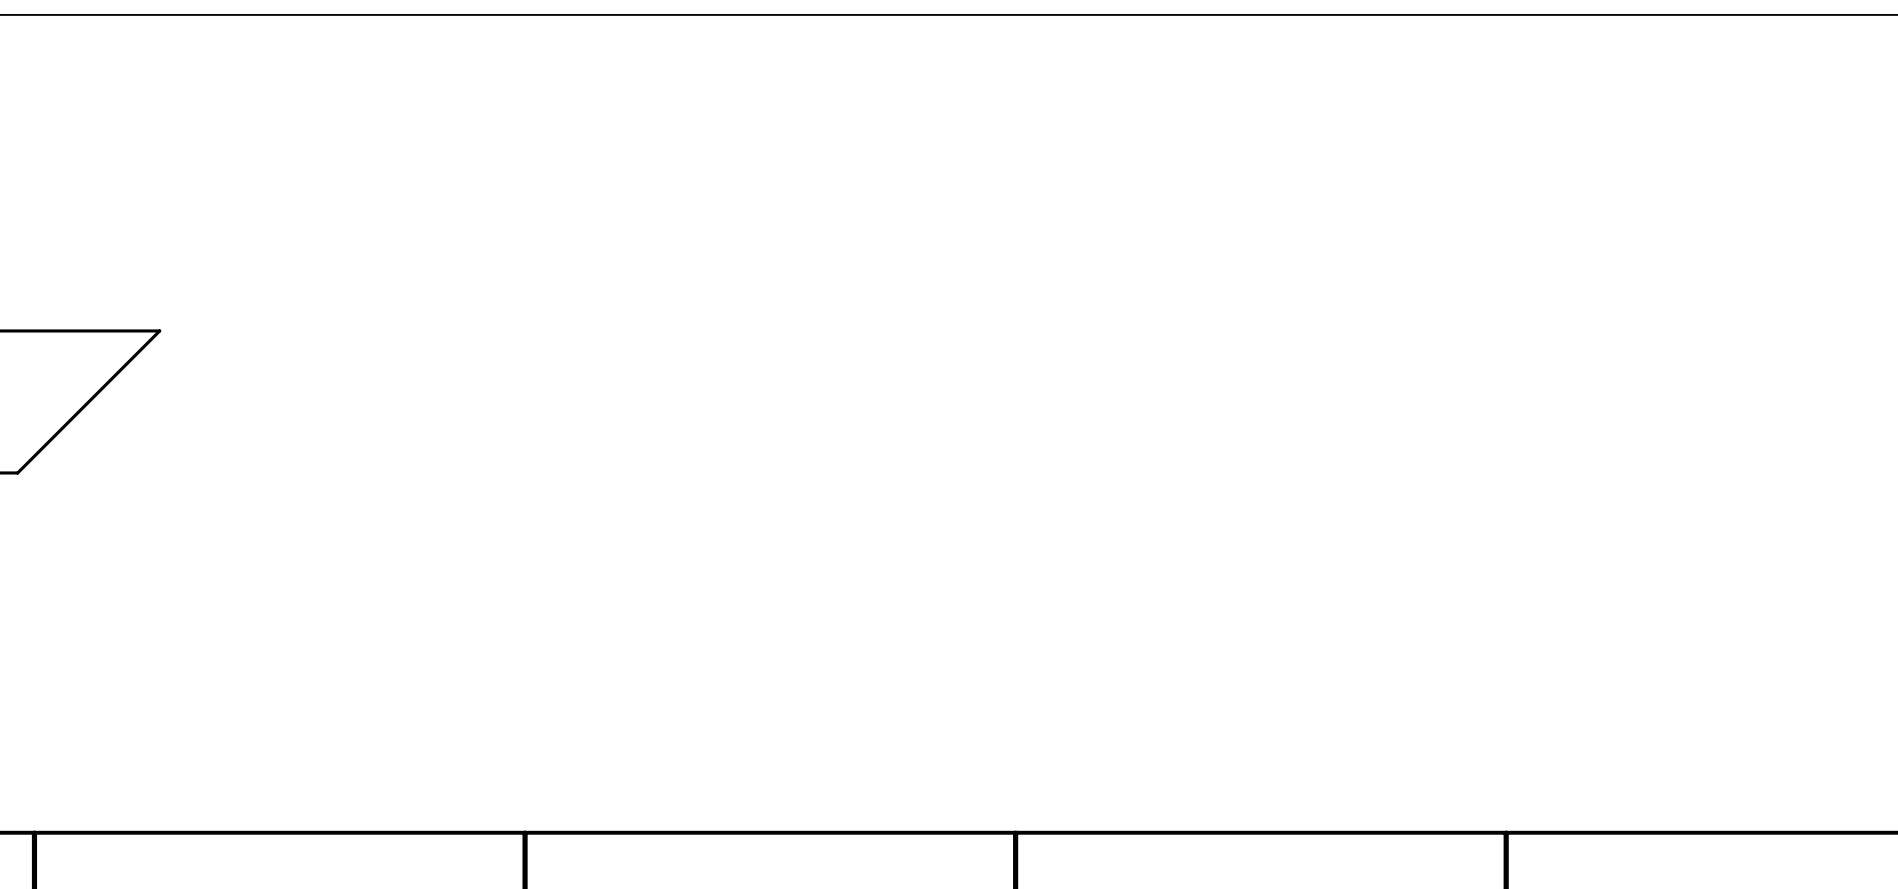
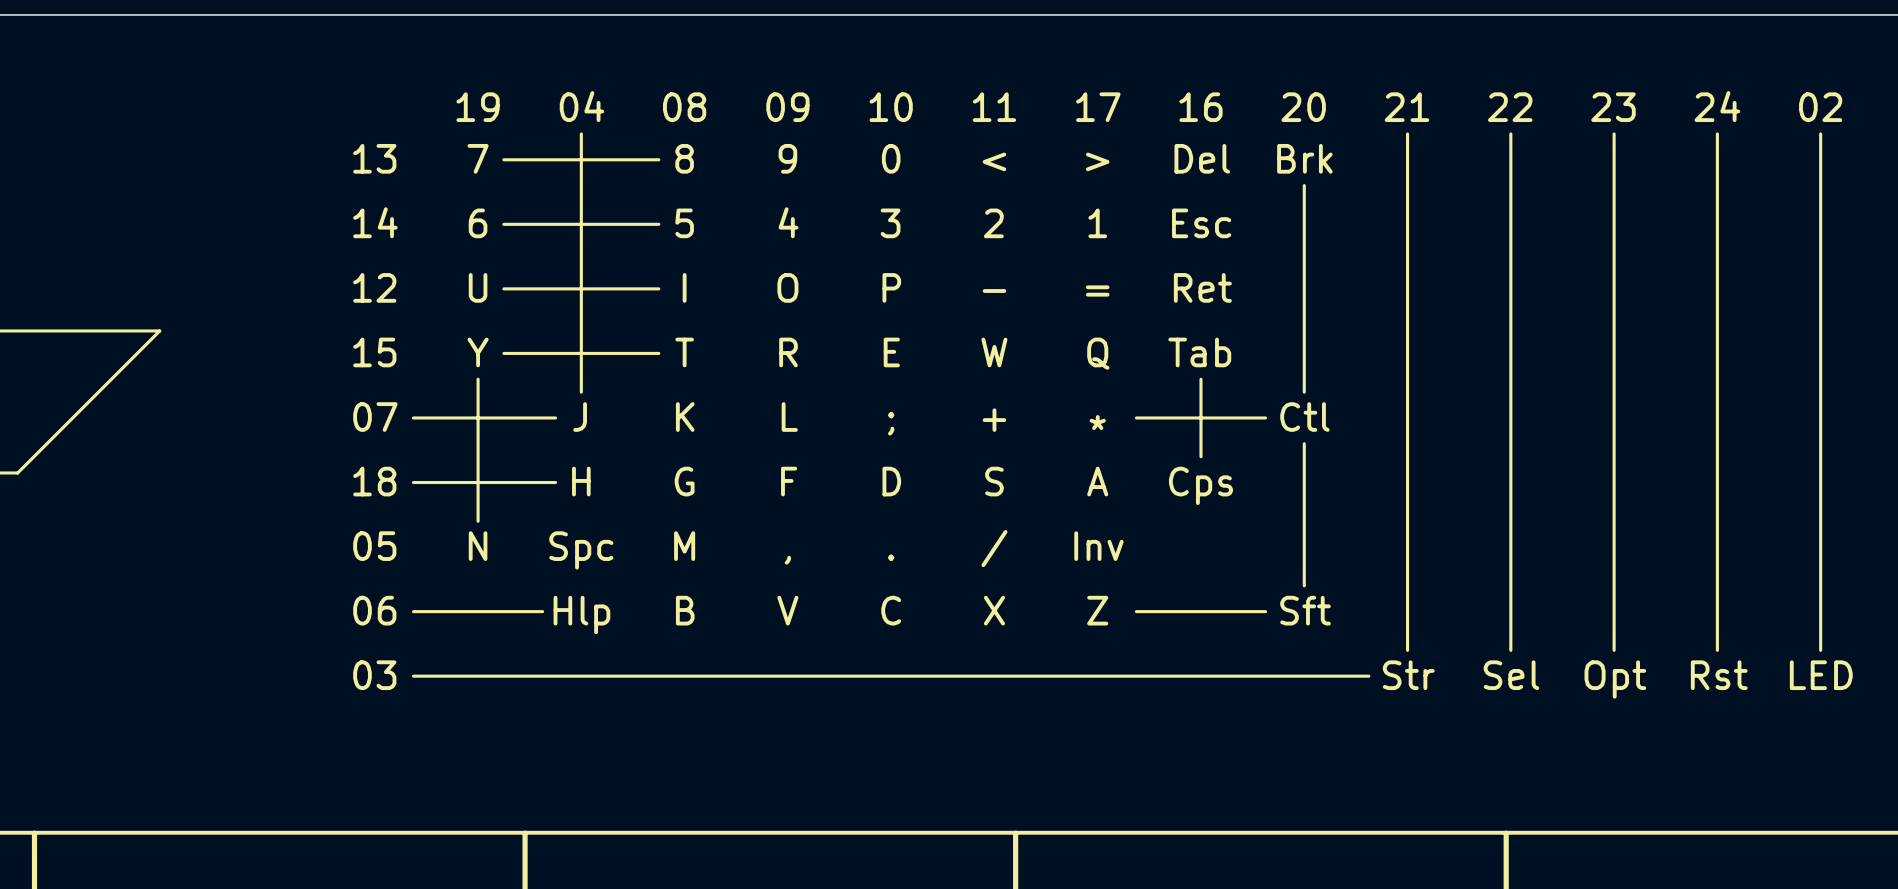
drawing: none -> [411, 132, 1823, 678]

